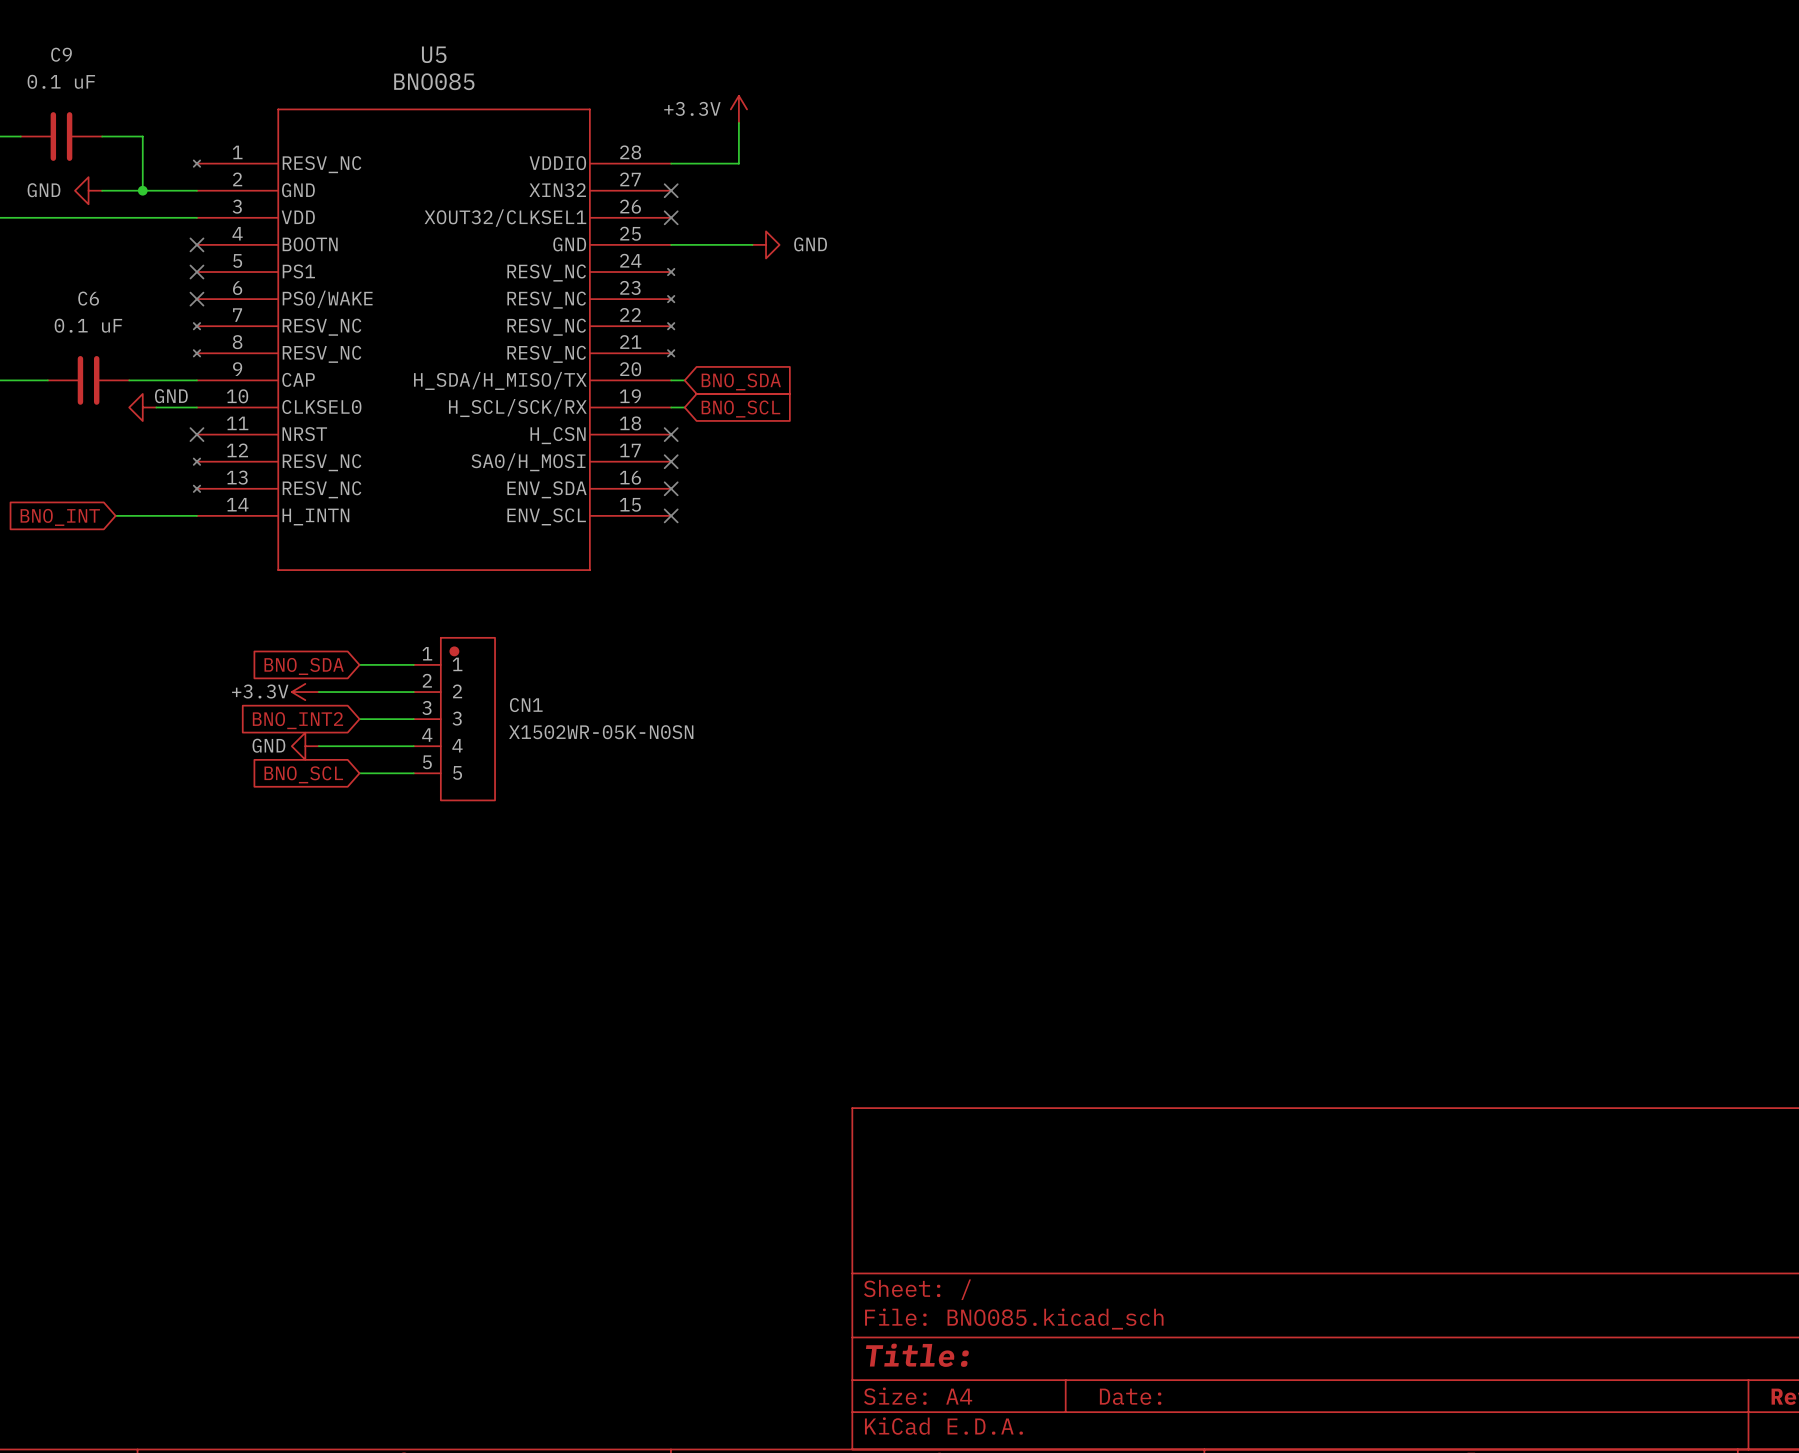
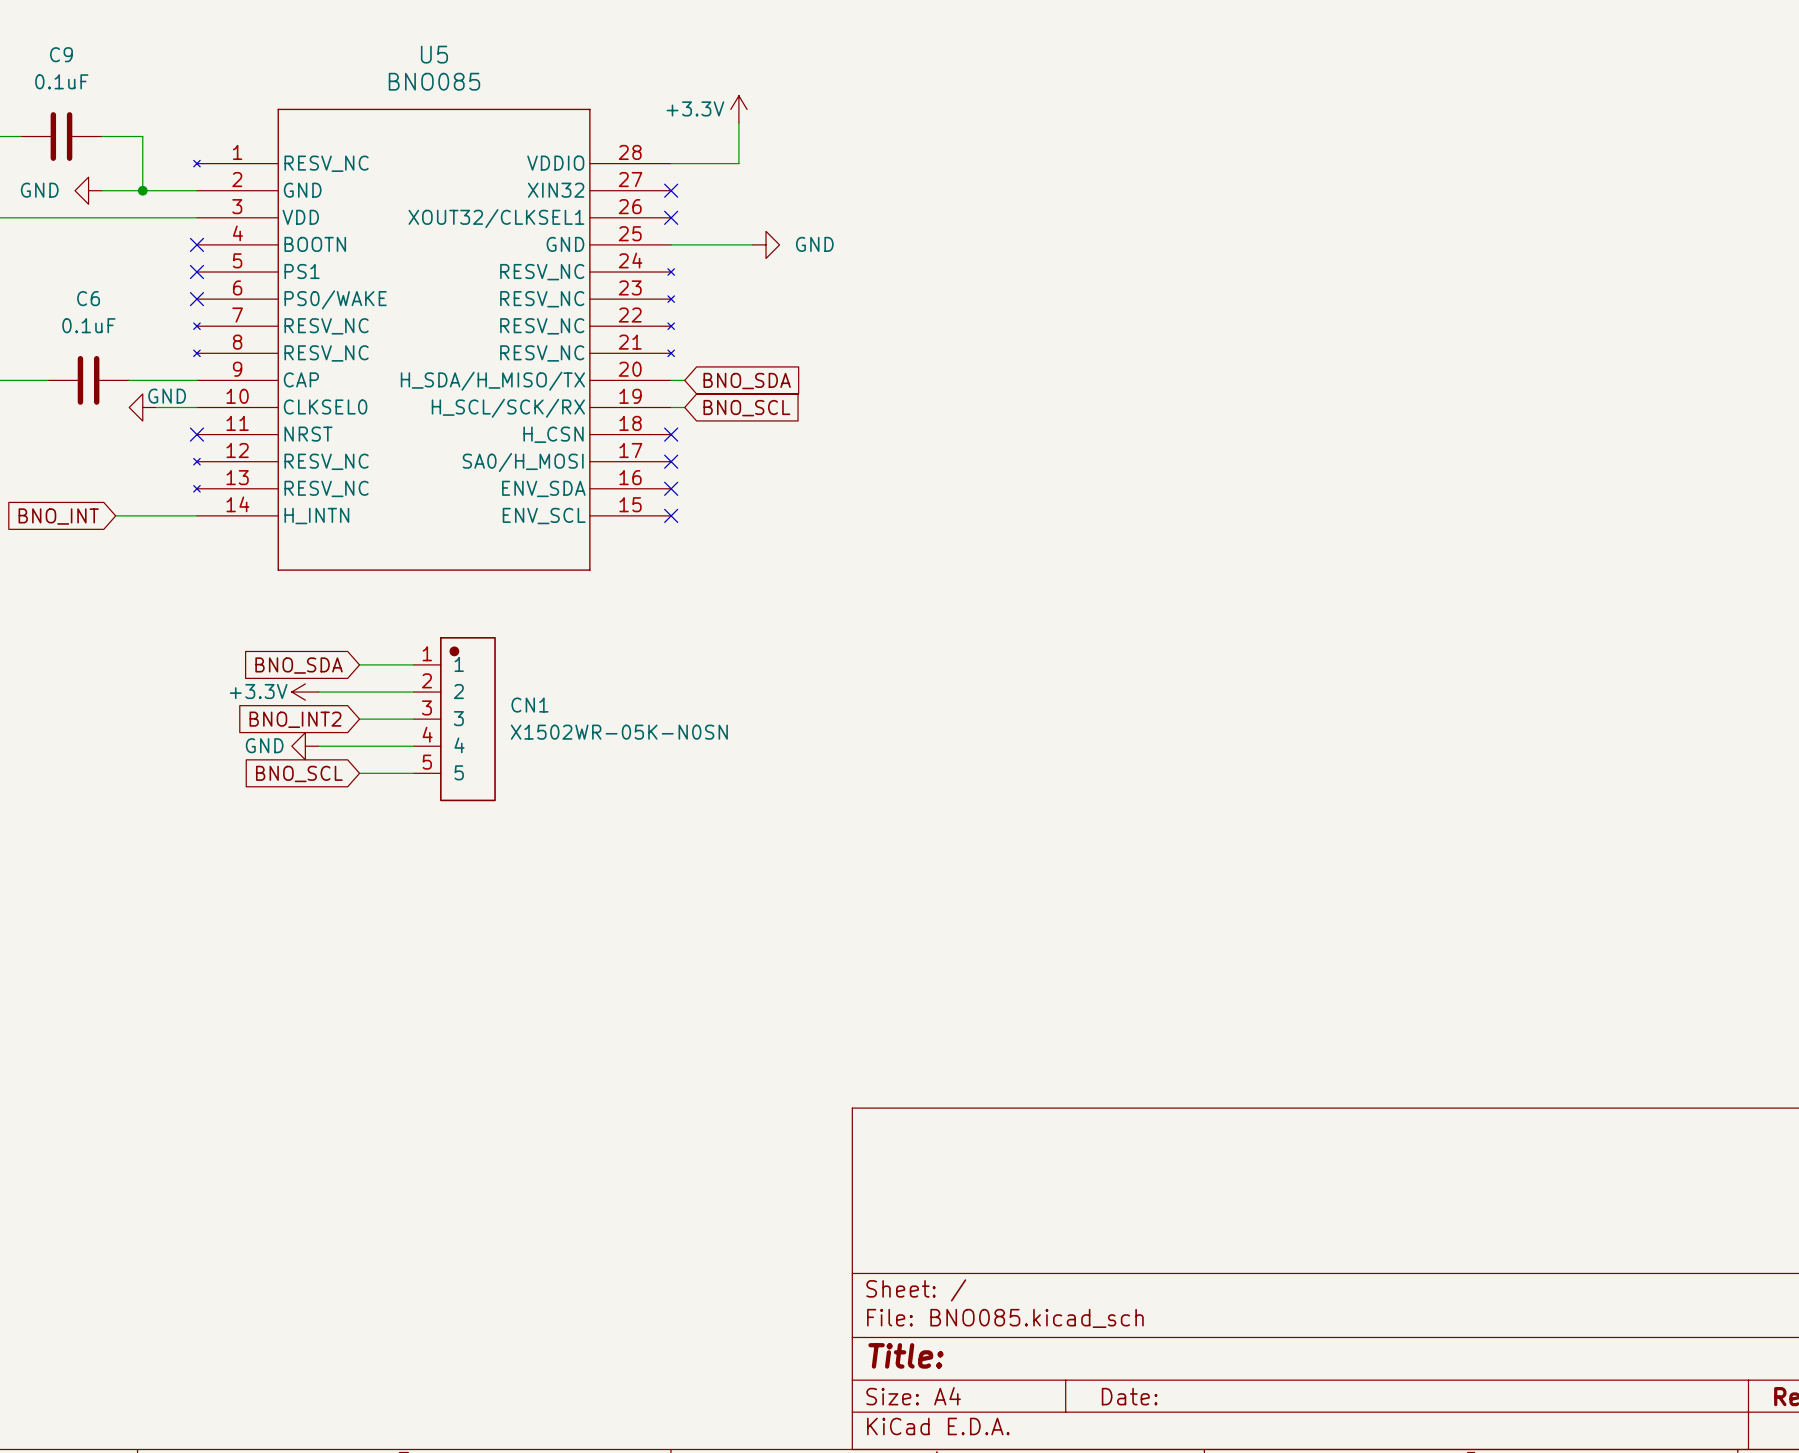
C9 value: 0.1 uF (61, 81) -> 0.1uF (61, 81)
C6 value: 0.1 uF (88, 325) -> 0.1uF (88, 325)

